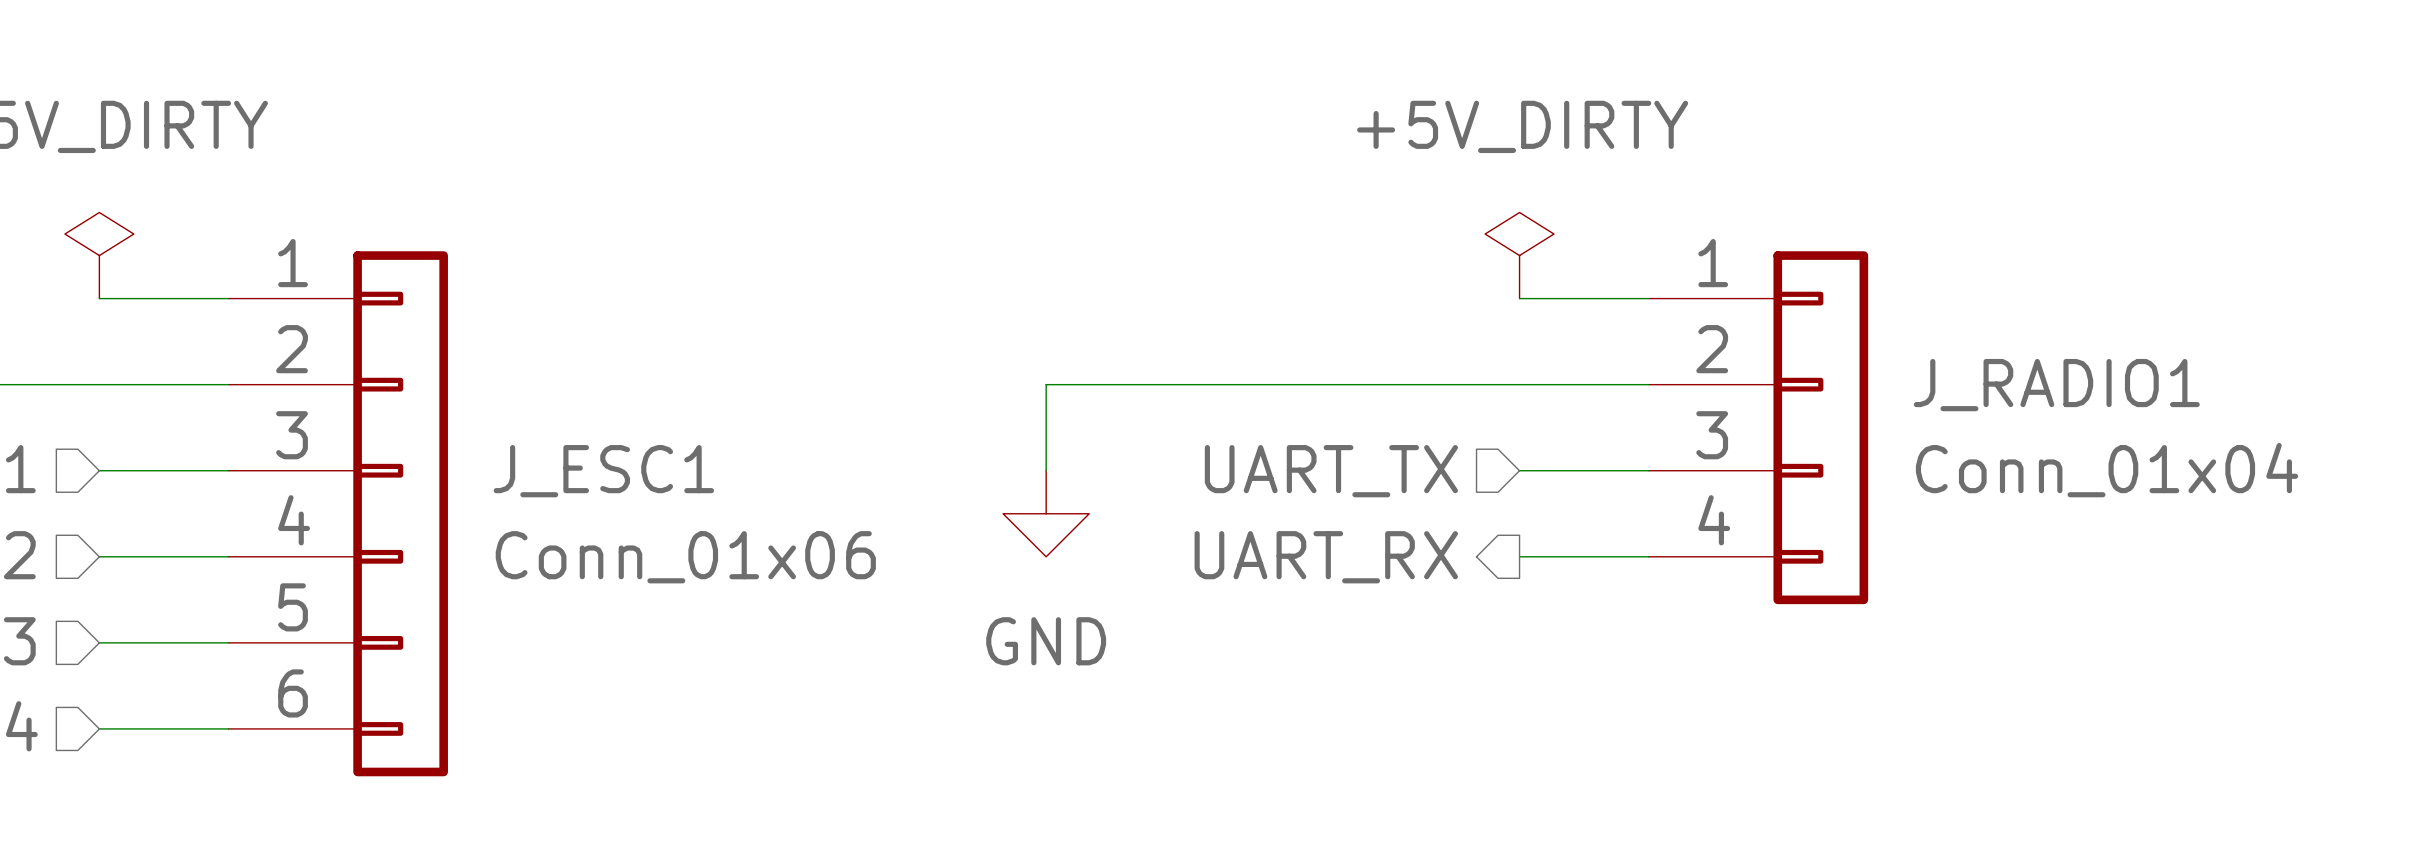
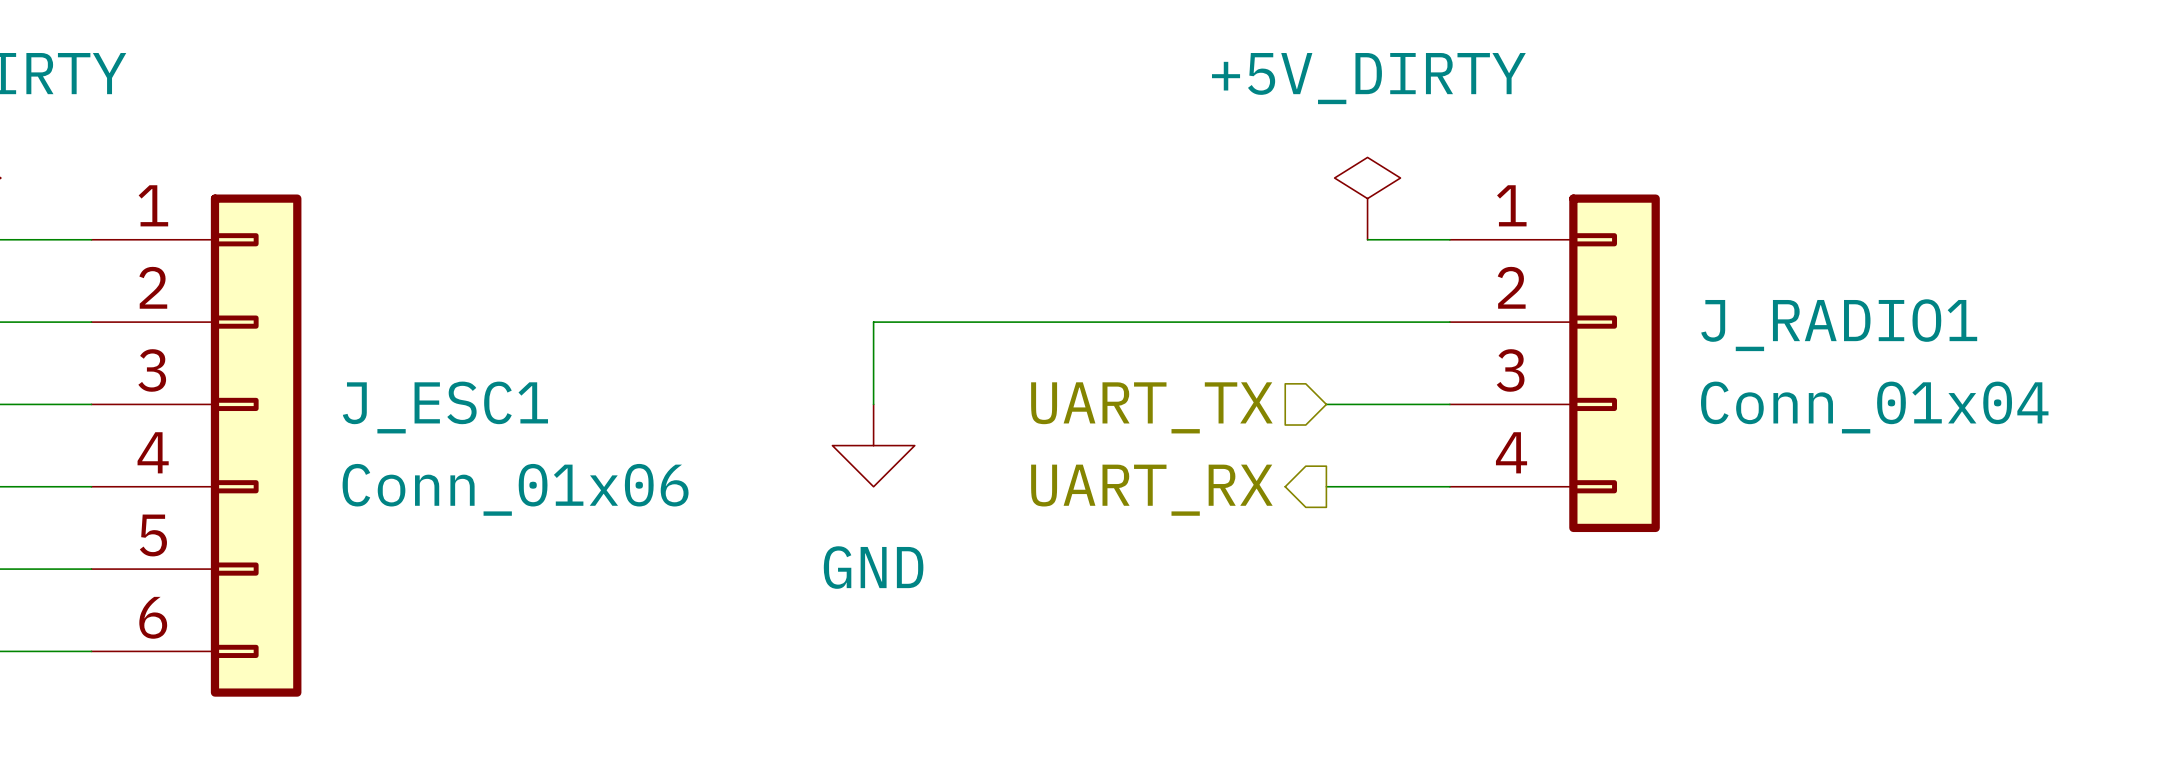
power symbol position: +5V_DIRTY (1519, 255) -> +5V_DIRTY (1367, 198)
wire: (1519, 298) (1562, 298) -> none

